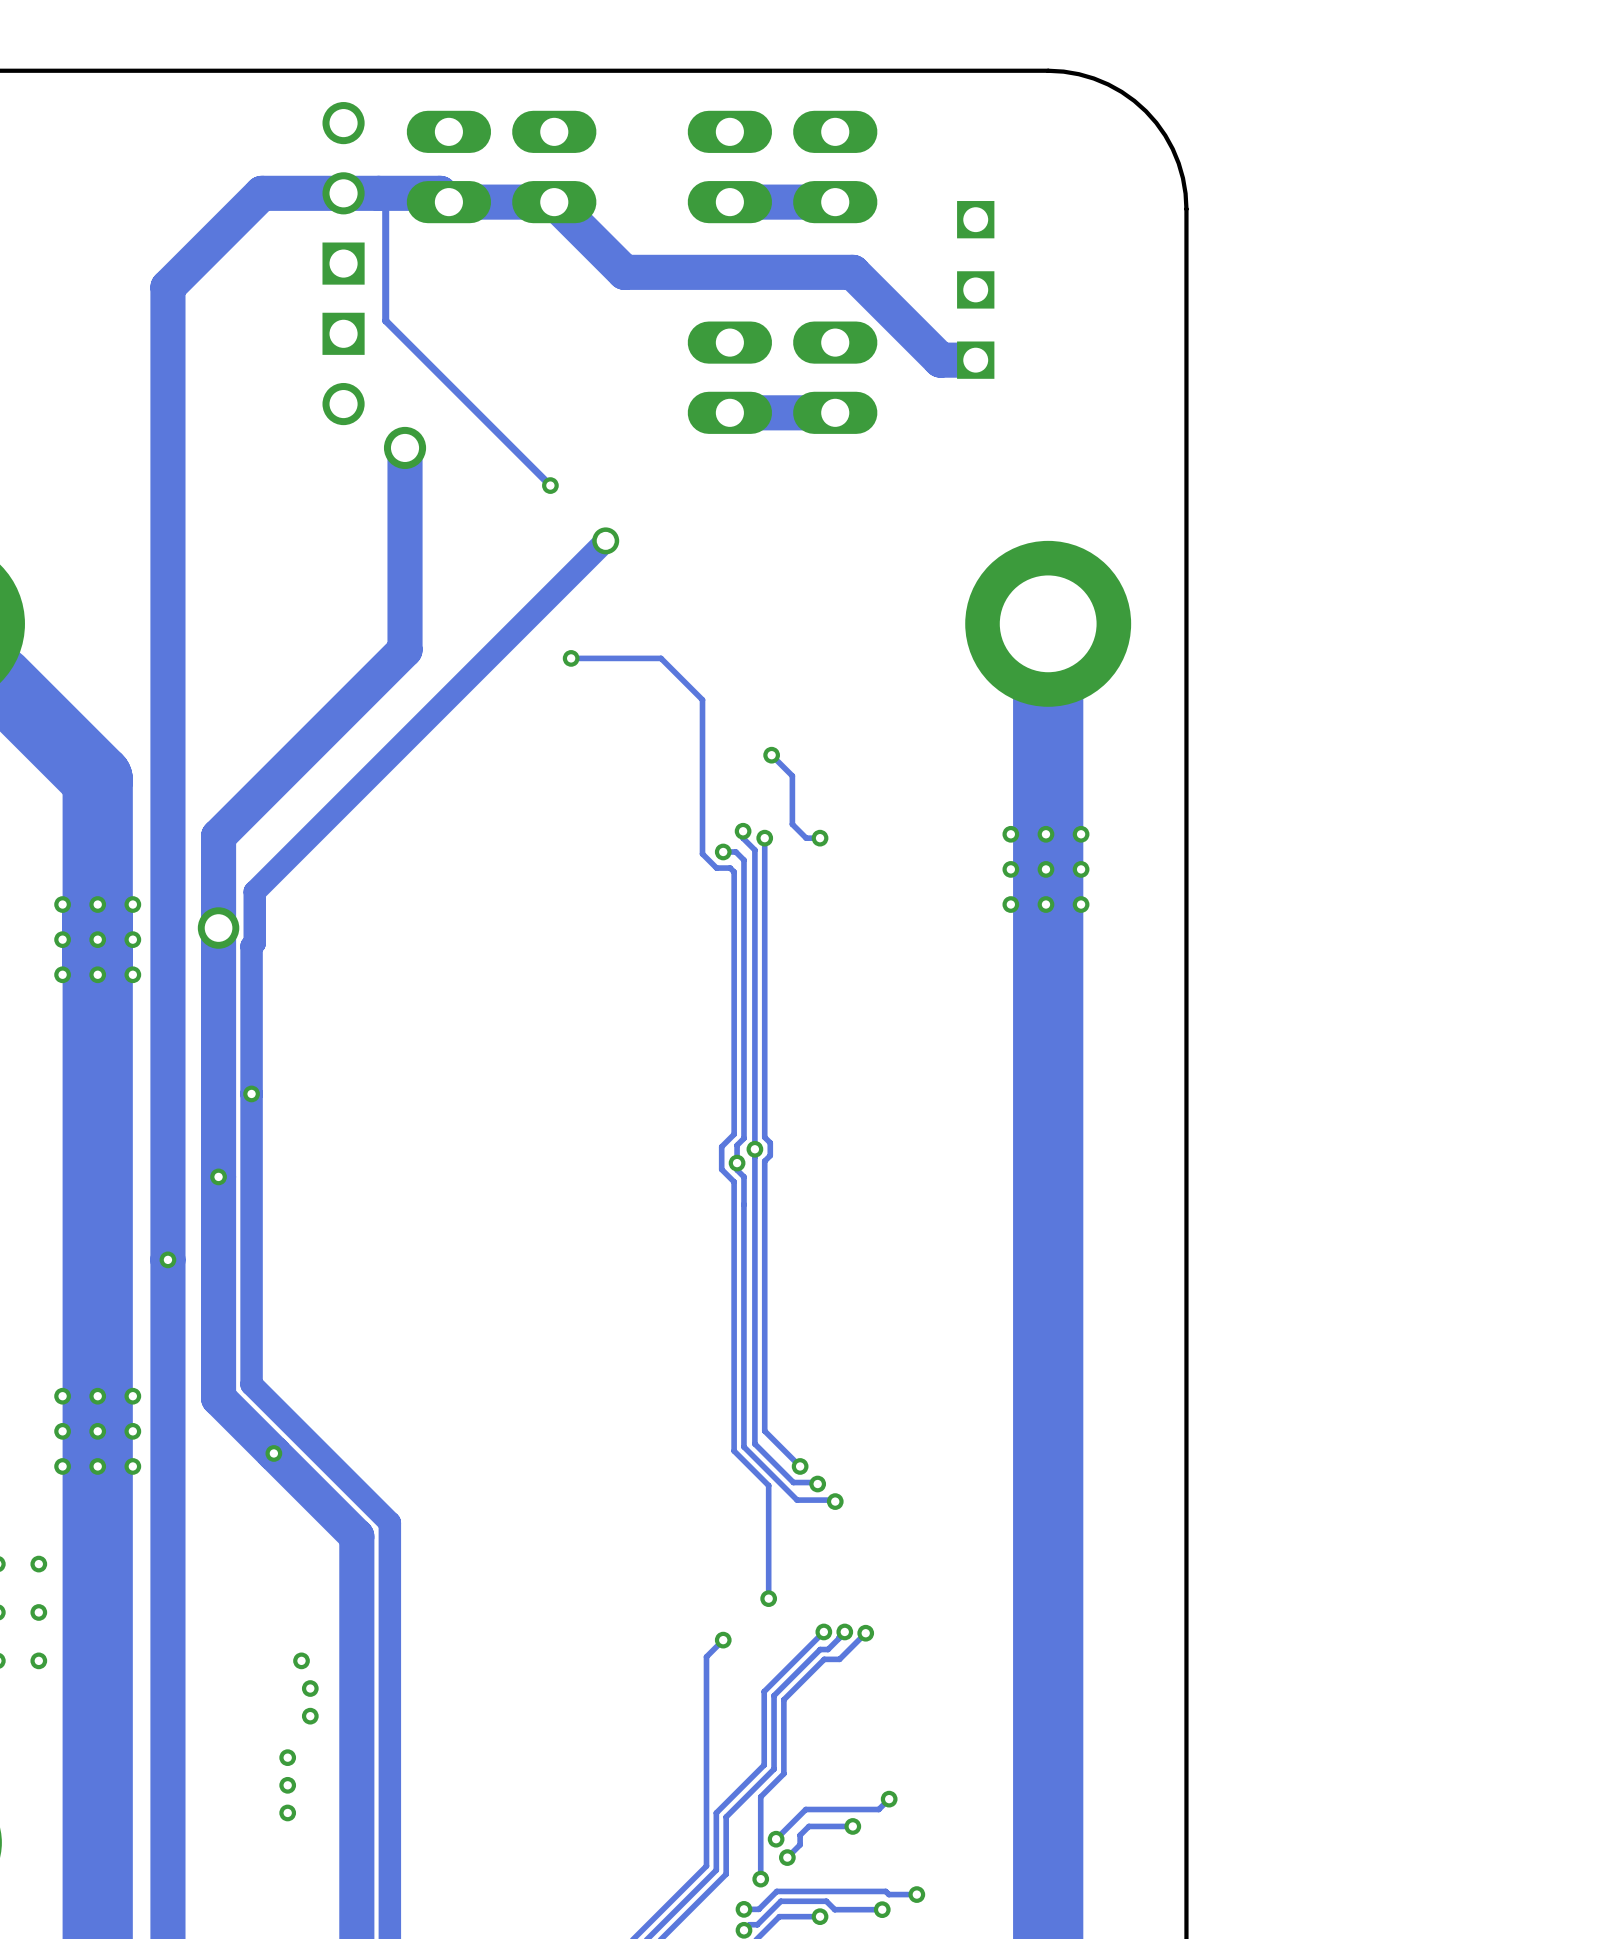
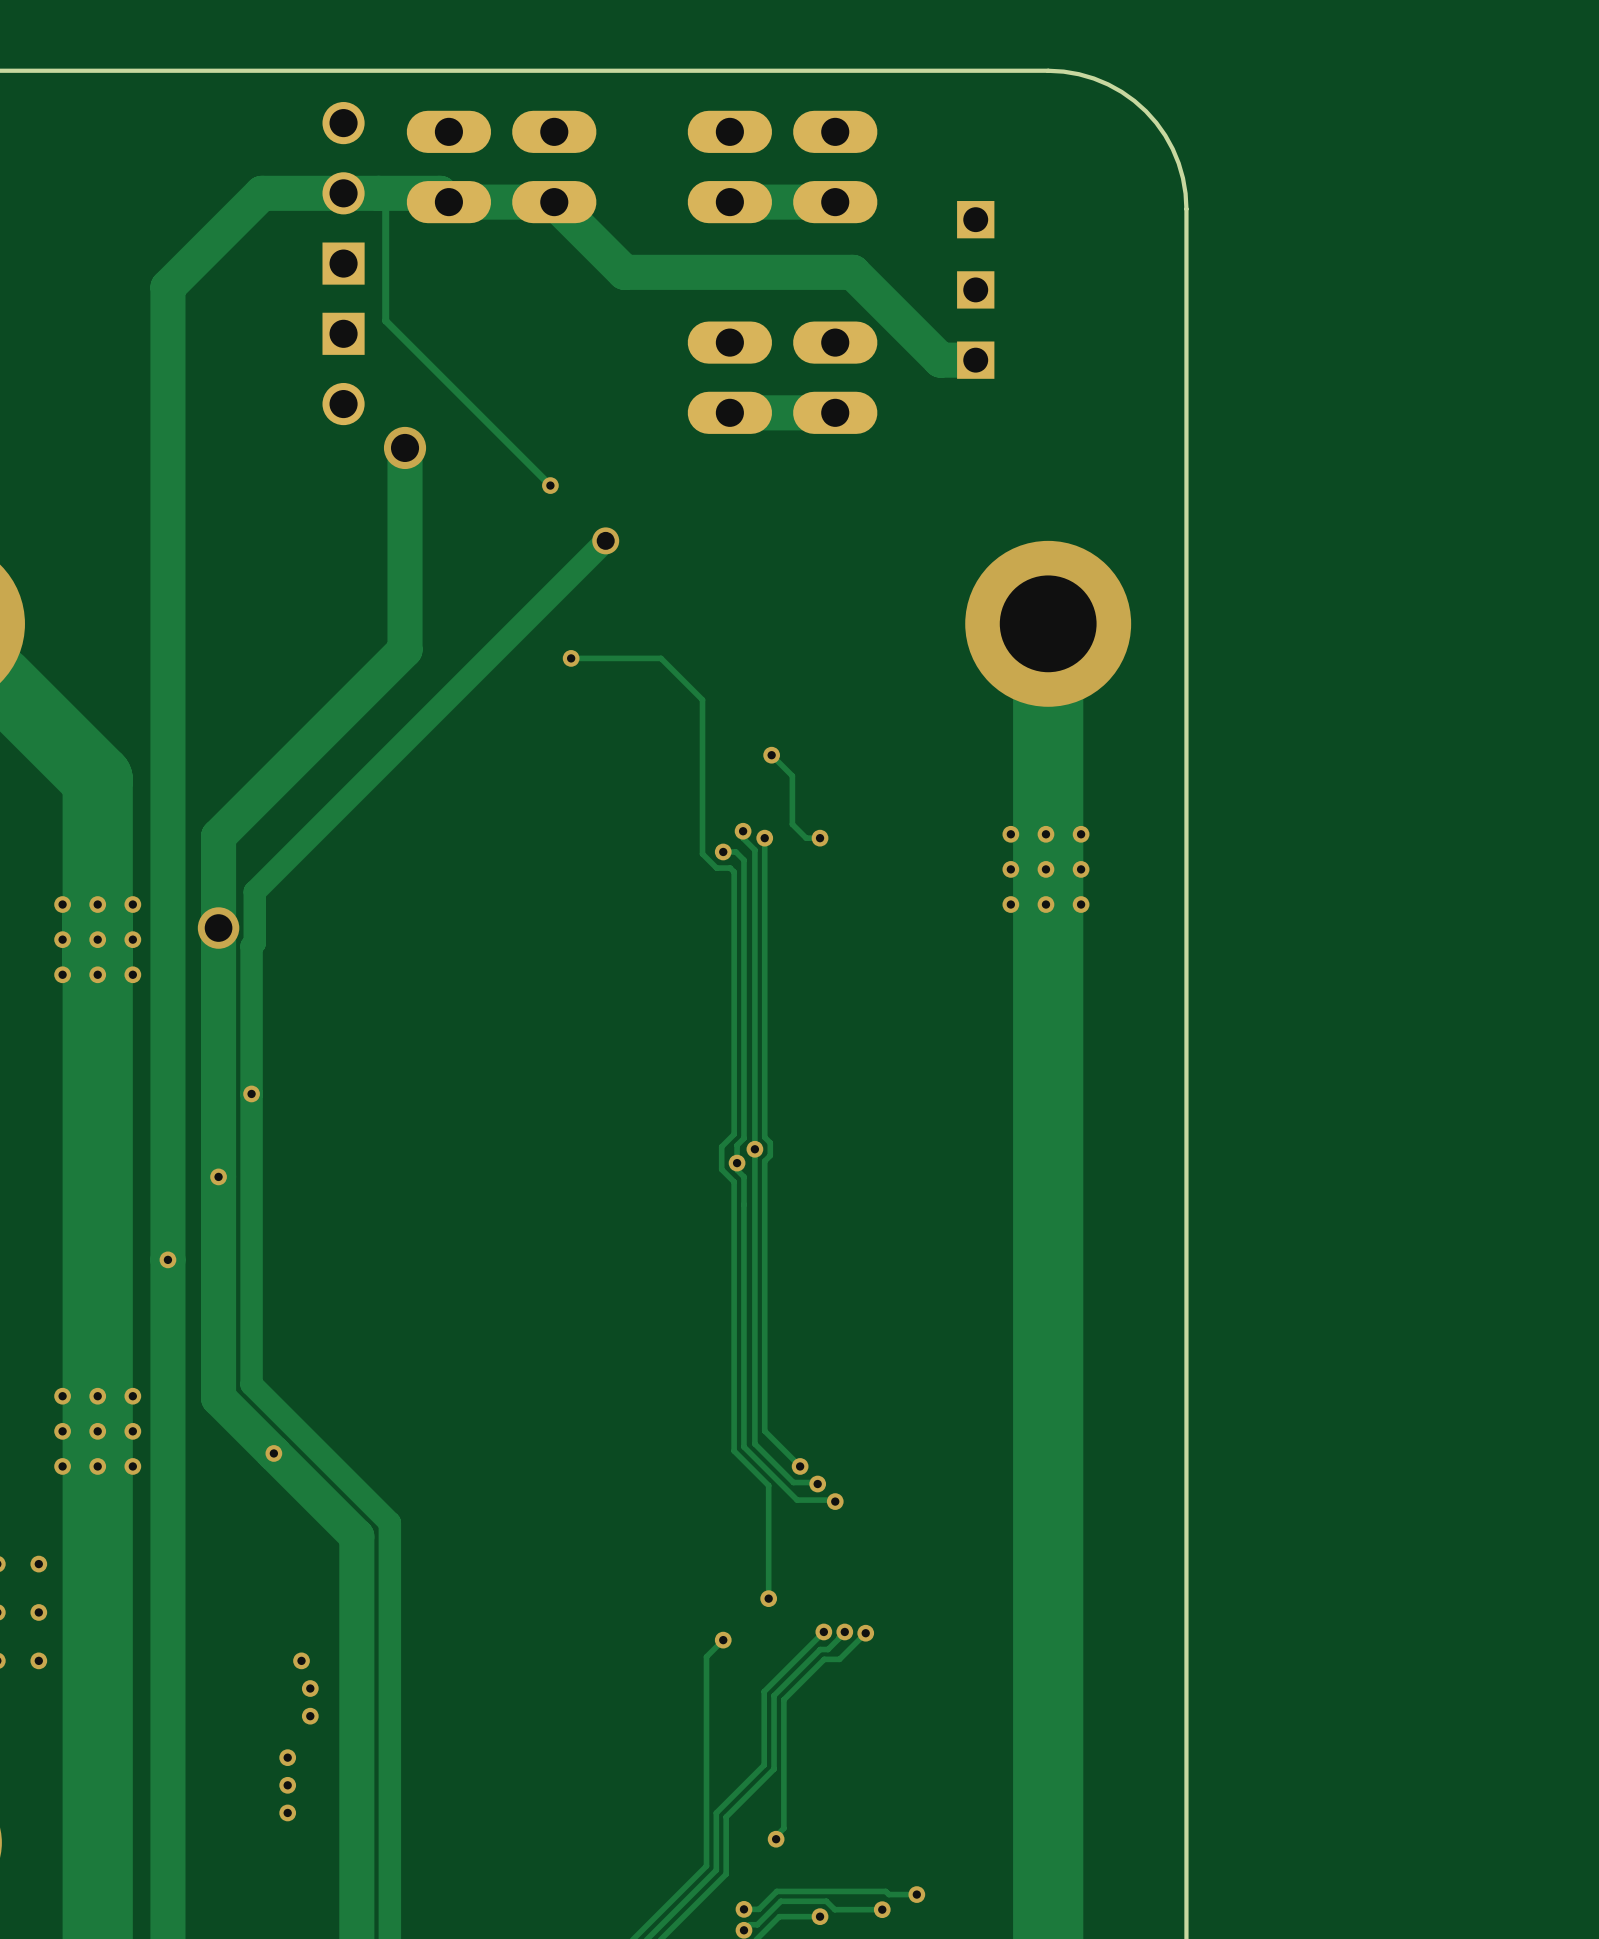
track: (783, 1773) (760, 1796) (760, 1879) -> (783, 1773) (783, 1828) (771, 1840)
track: (889, 1799) (878, 1809) (805, 1809) (776, 1839) -> none
via: (889, 1799) -> none
track: (852, 1826) (808, 1826) (800, 1835) (800, 1844) (787, 1857) -> none
via: (852, 1826) -> none
via: (787, 1857) -> none
via: (760, 1879) -> none

